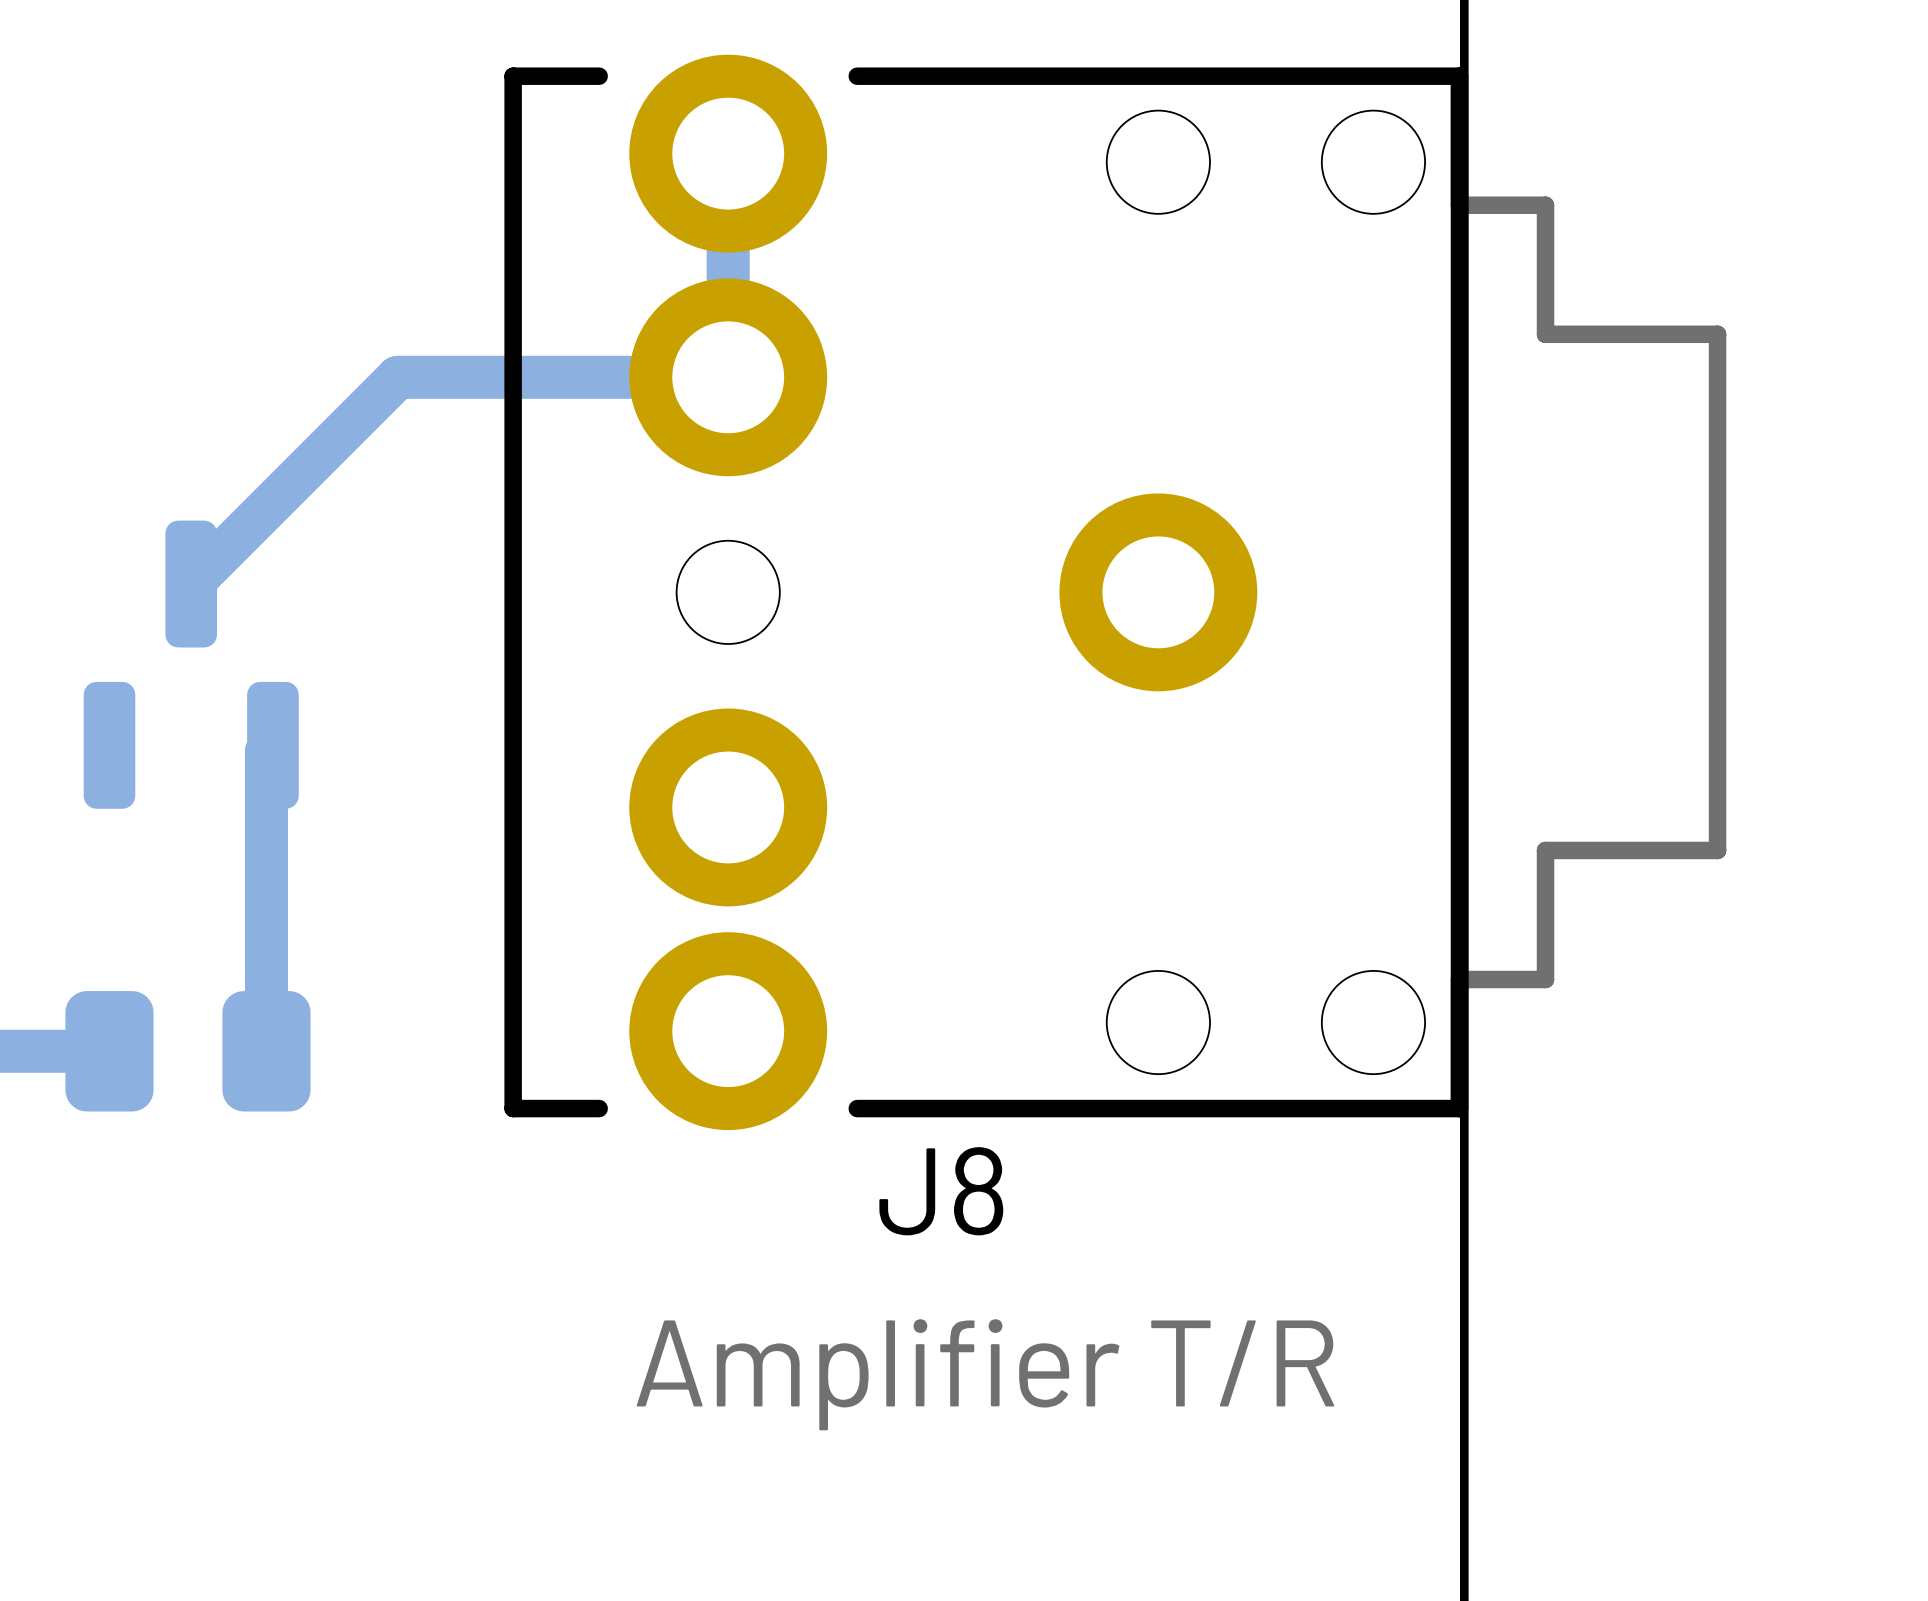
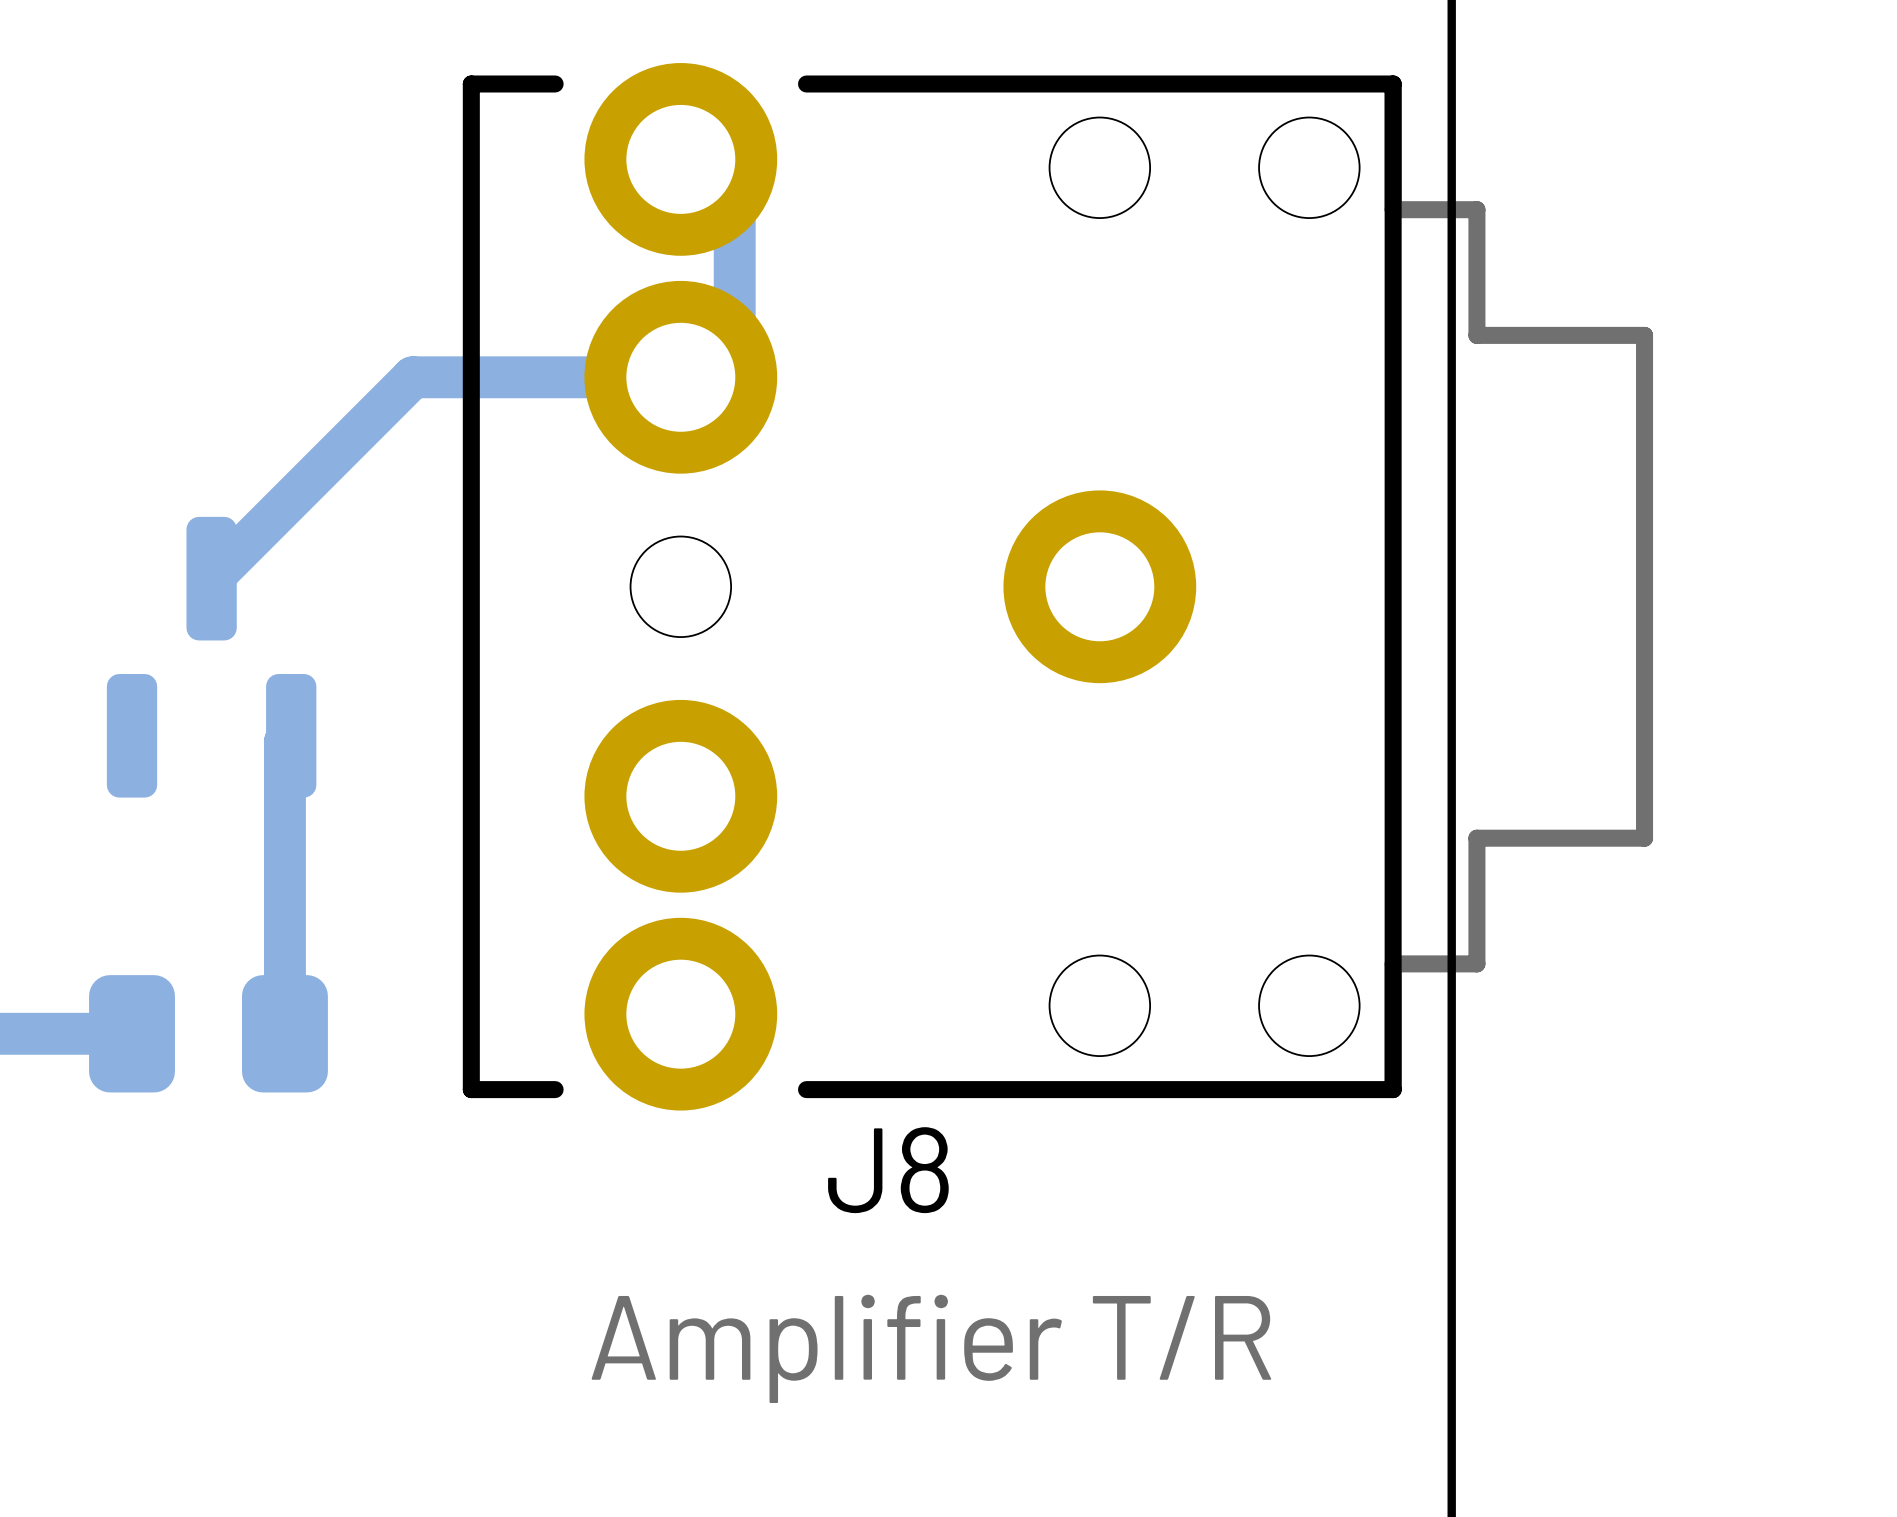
J8 position: (1115, 592) -> (1057, 586)

